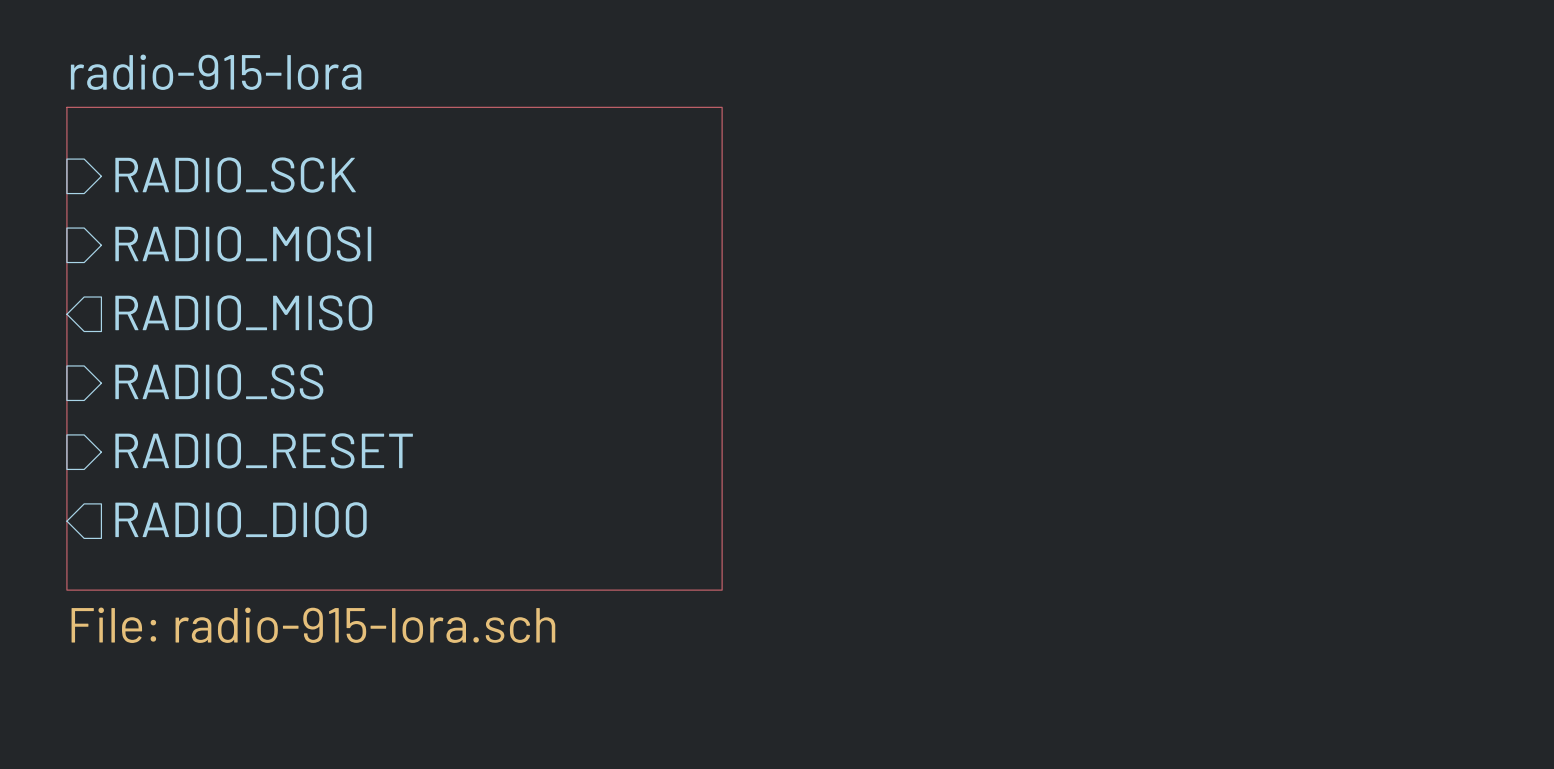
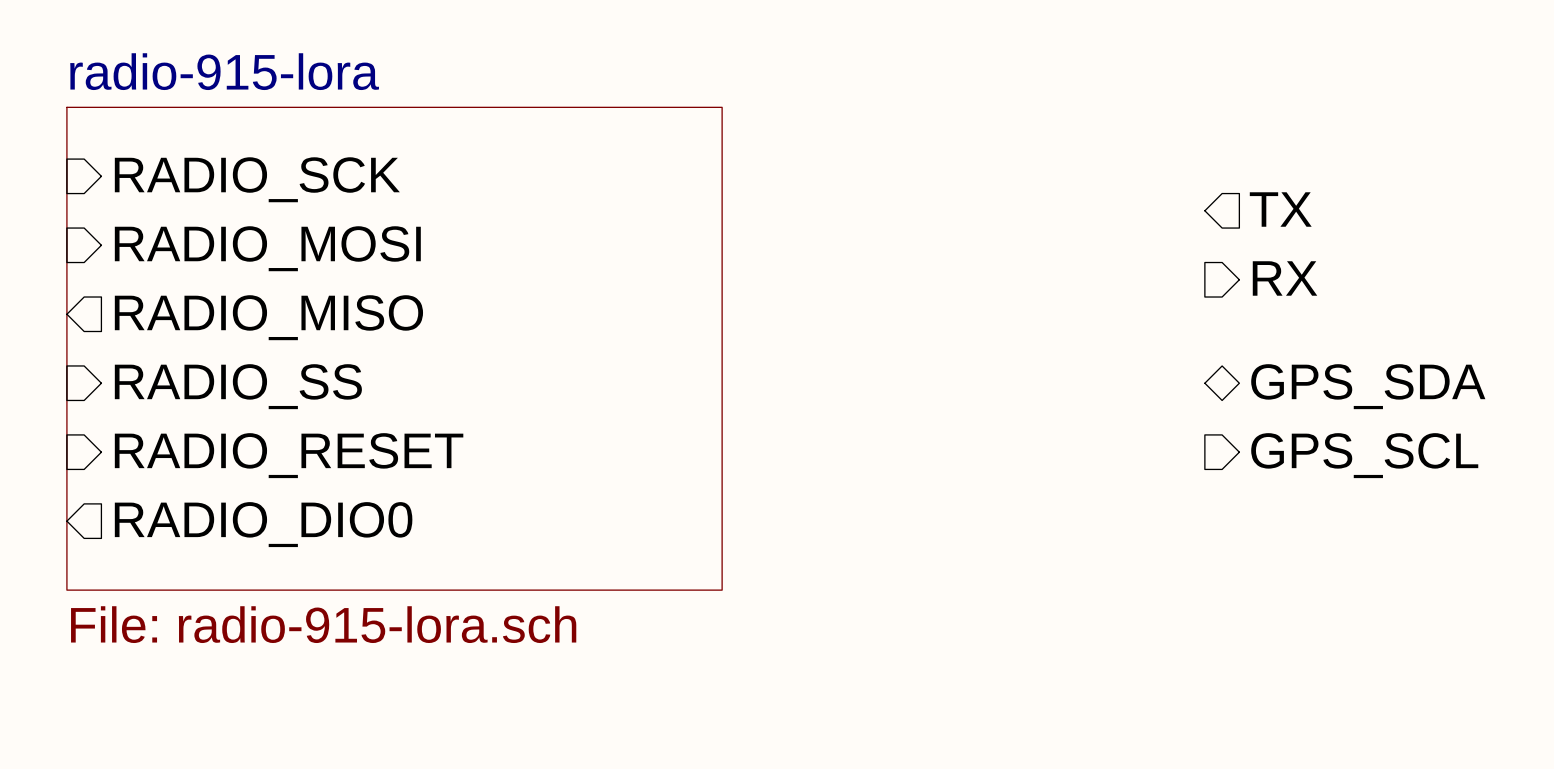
sheet pin: none -> TX (1280, 209)
sheet pin: none -> RX (1285, 278)
sheet pin: none -> GPS_SDA (1368, 386)
sheet pin: none -> GPS_SCL (1364, 455)

